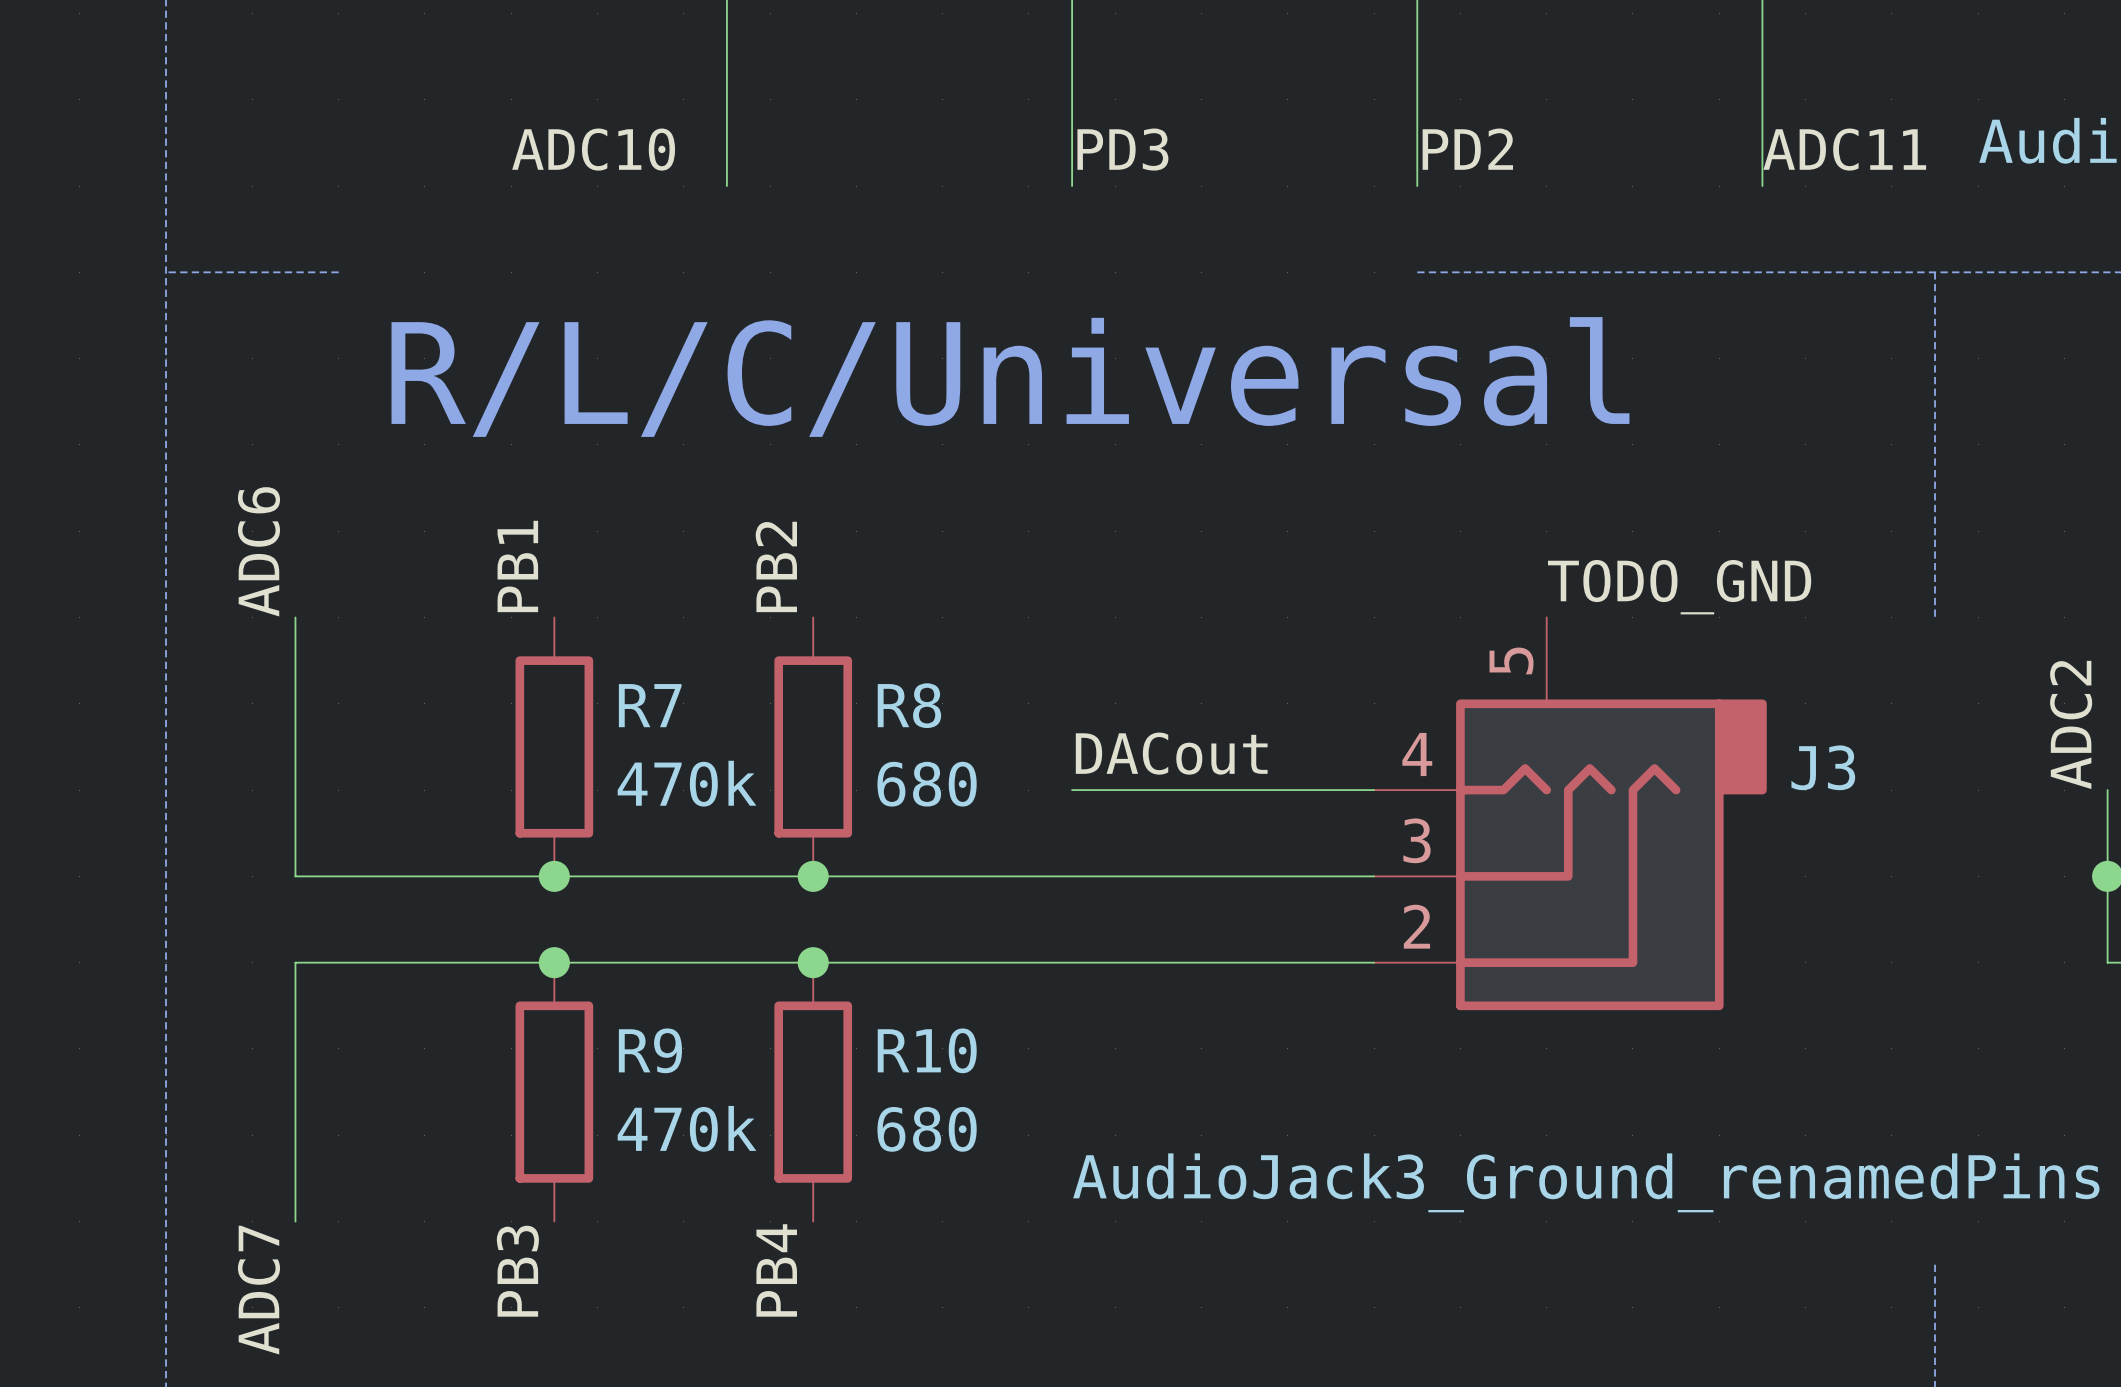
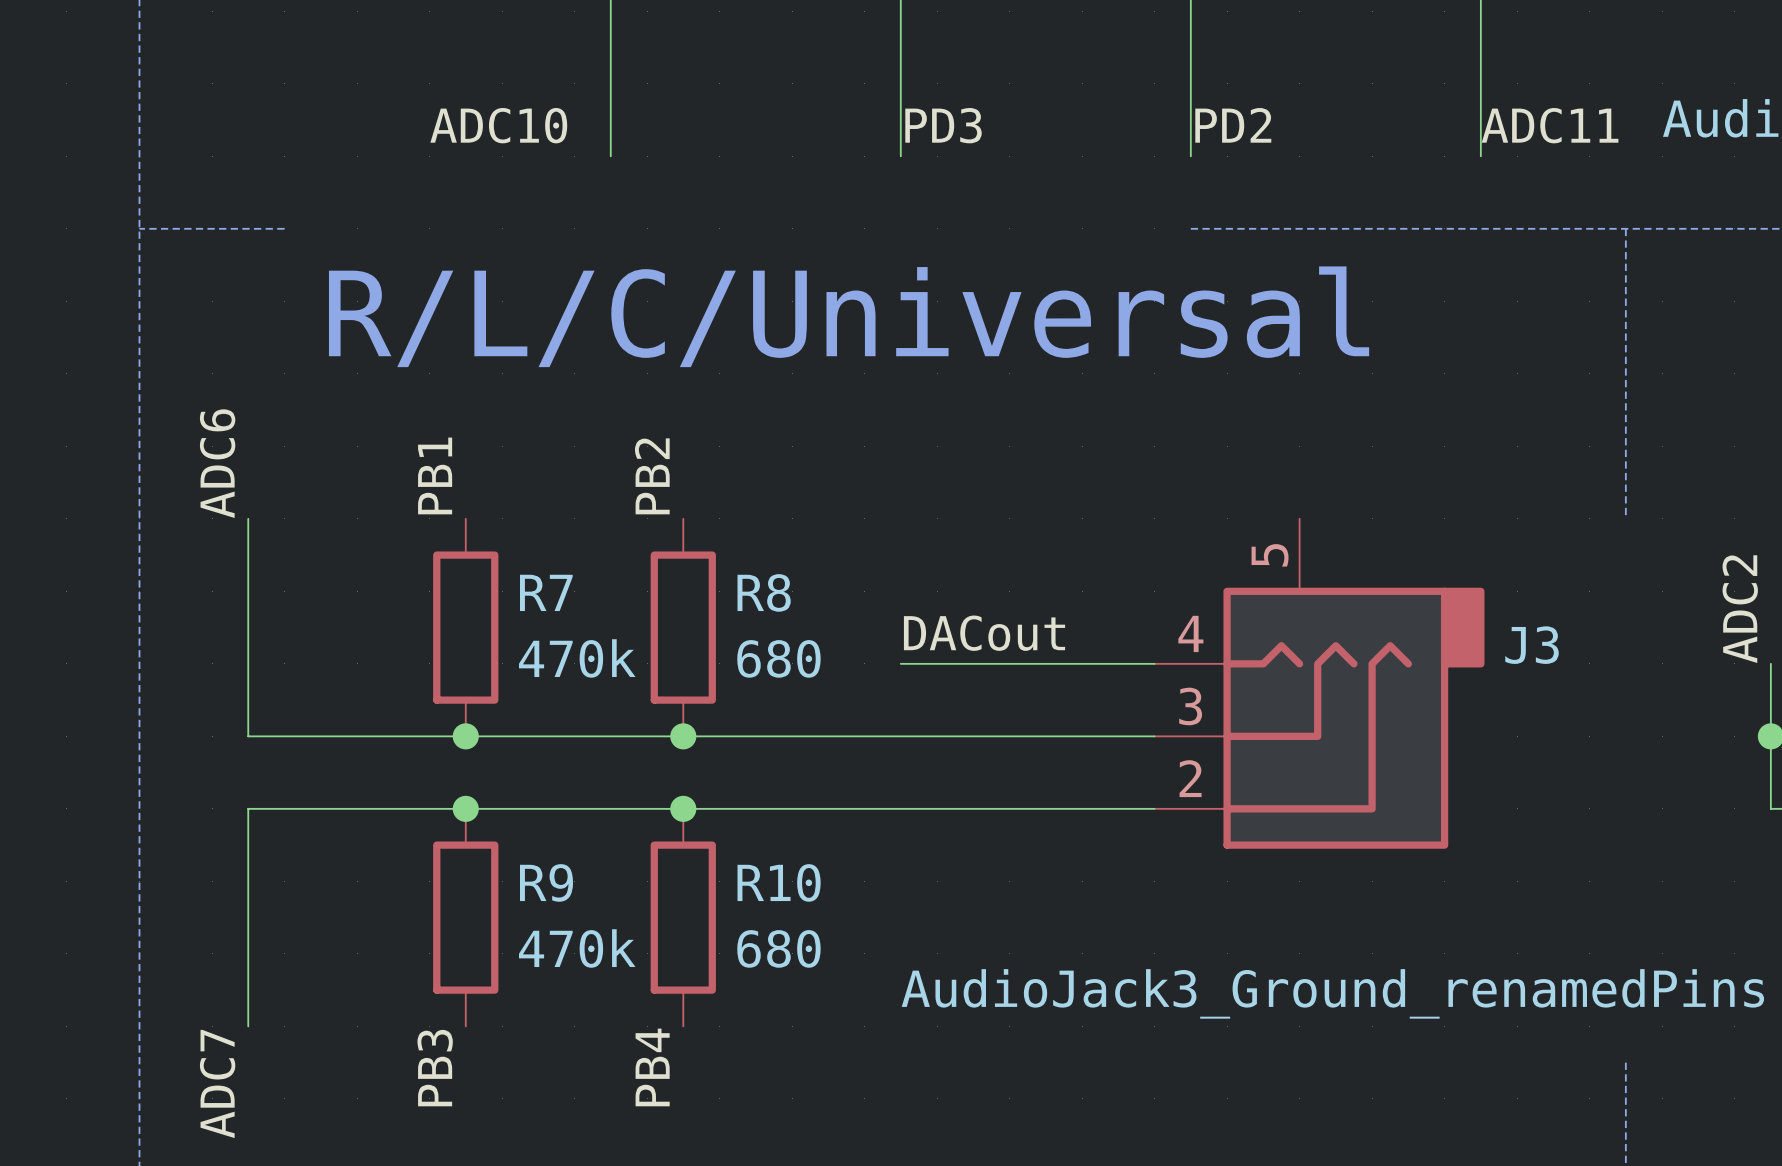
label: TODO_GND (1679, 587) -> none

